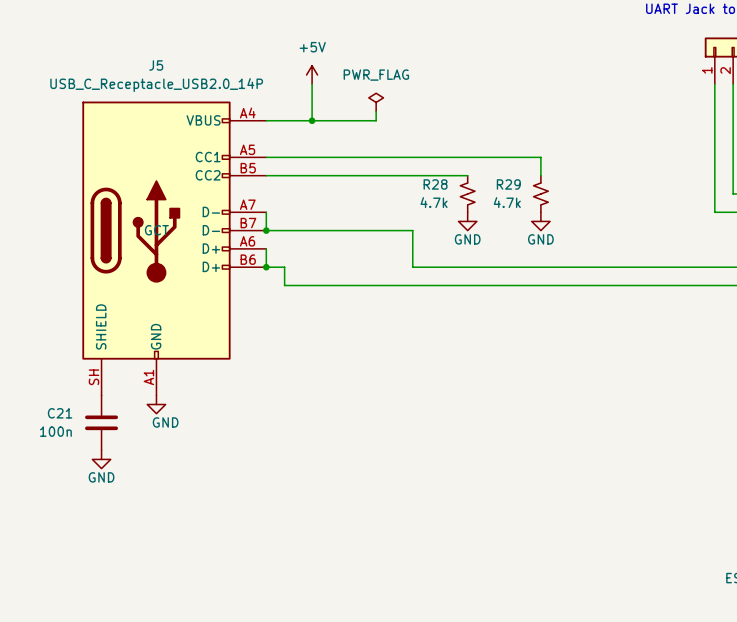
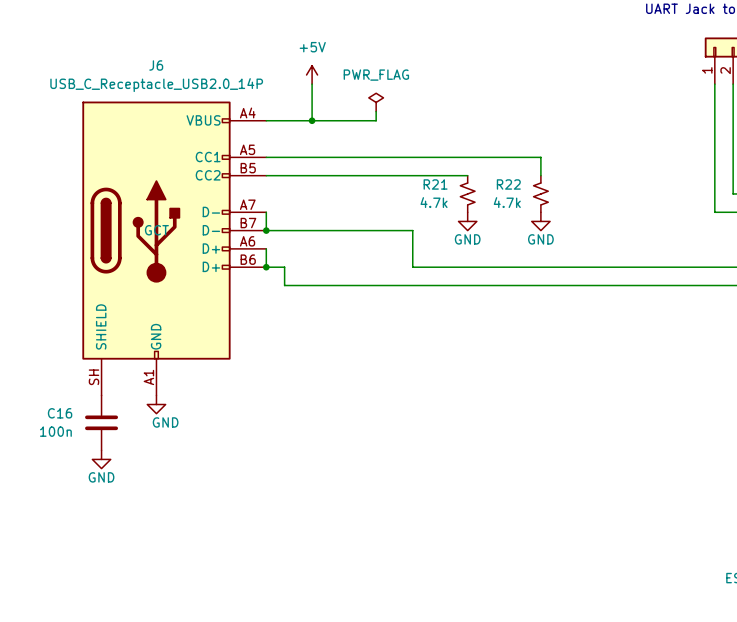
J5 name: J5 (156, 65) -> J6 (156, 65)
R28 name: R28 (435, 184) -> R21 (435, 184)
R29 name: R29 (508, 184) -> R22 (508, 184)
C21 name: C21 (60, 413) -> C16 (60, 413)

